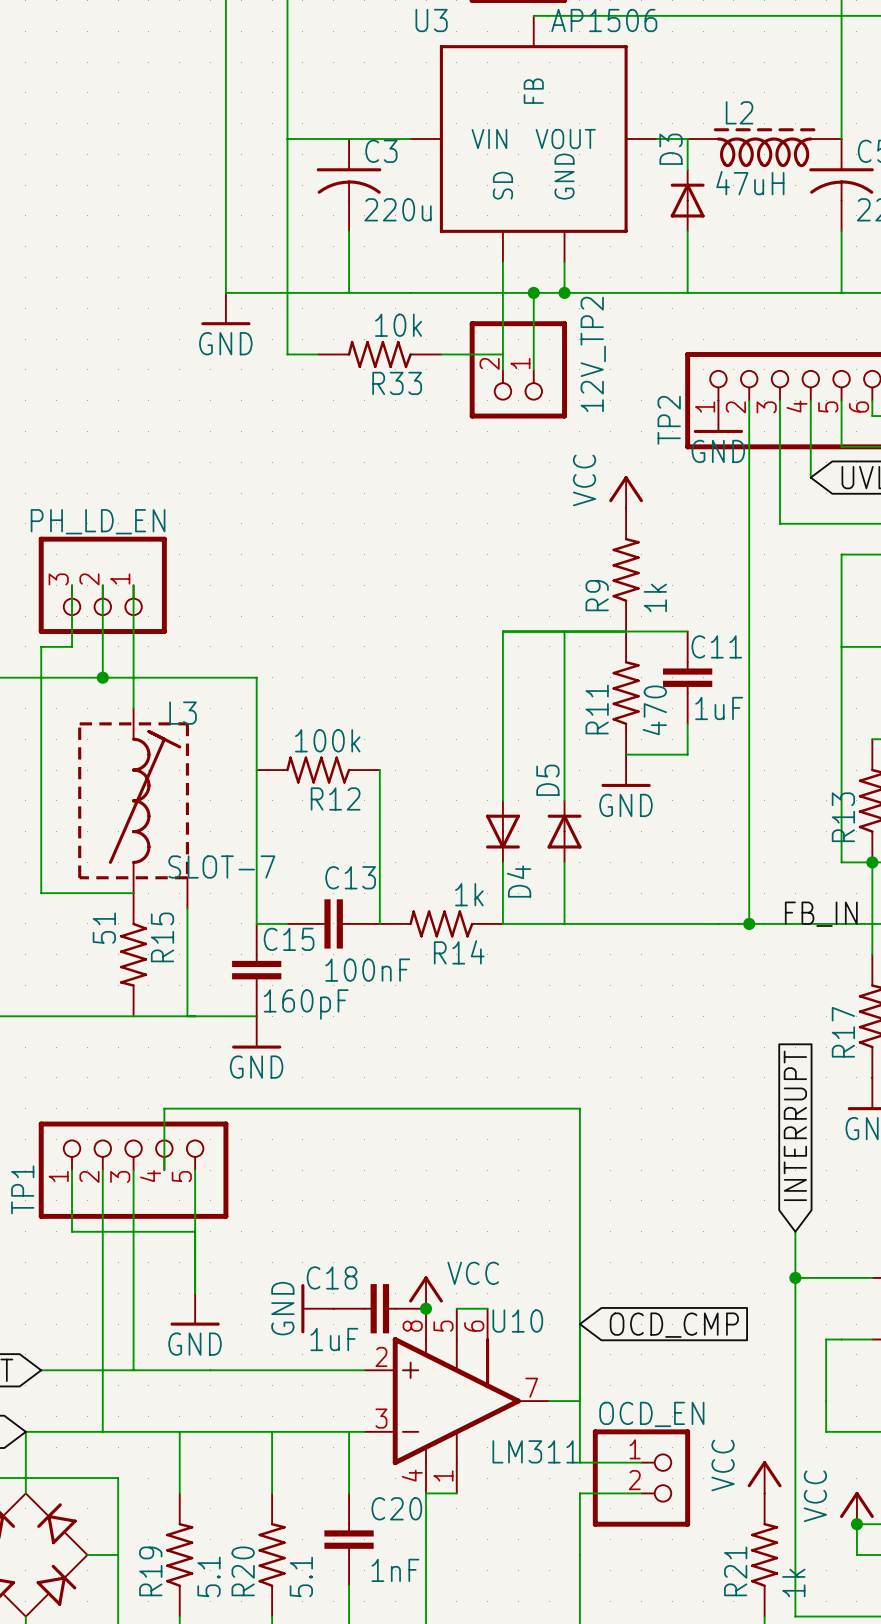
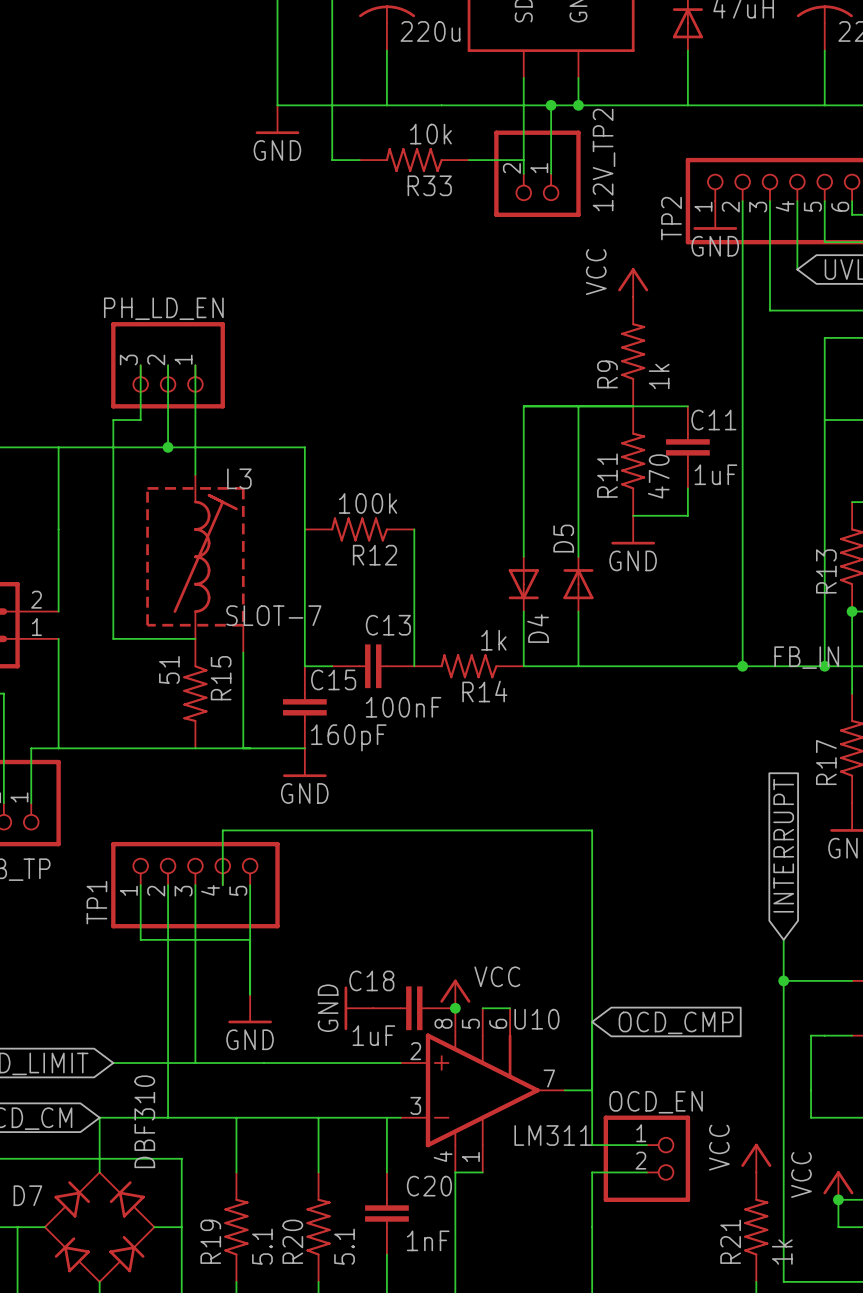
wire: (841, 862) (872, 862) -> (824, 611) (824, 666)
junction: none -> (824, 666)
D7 value: none -> DBF310 (144, 1121)

